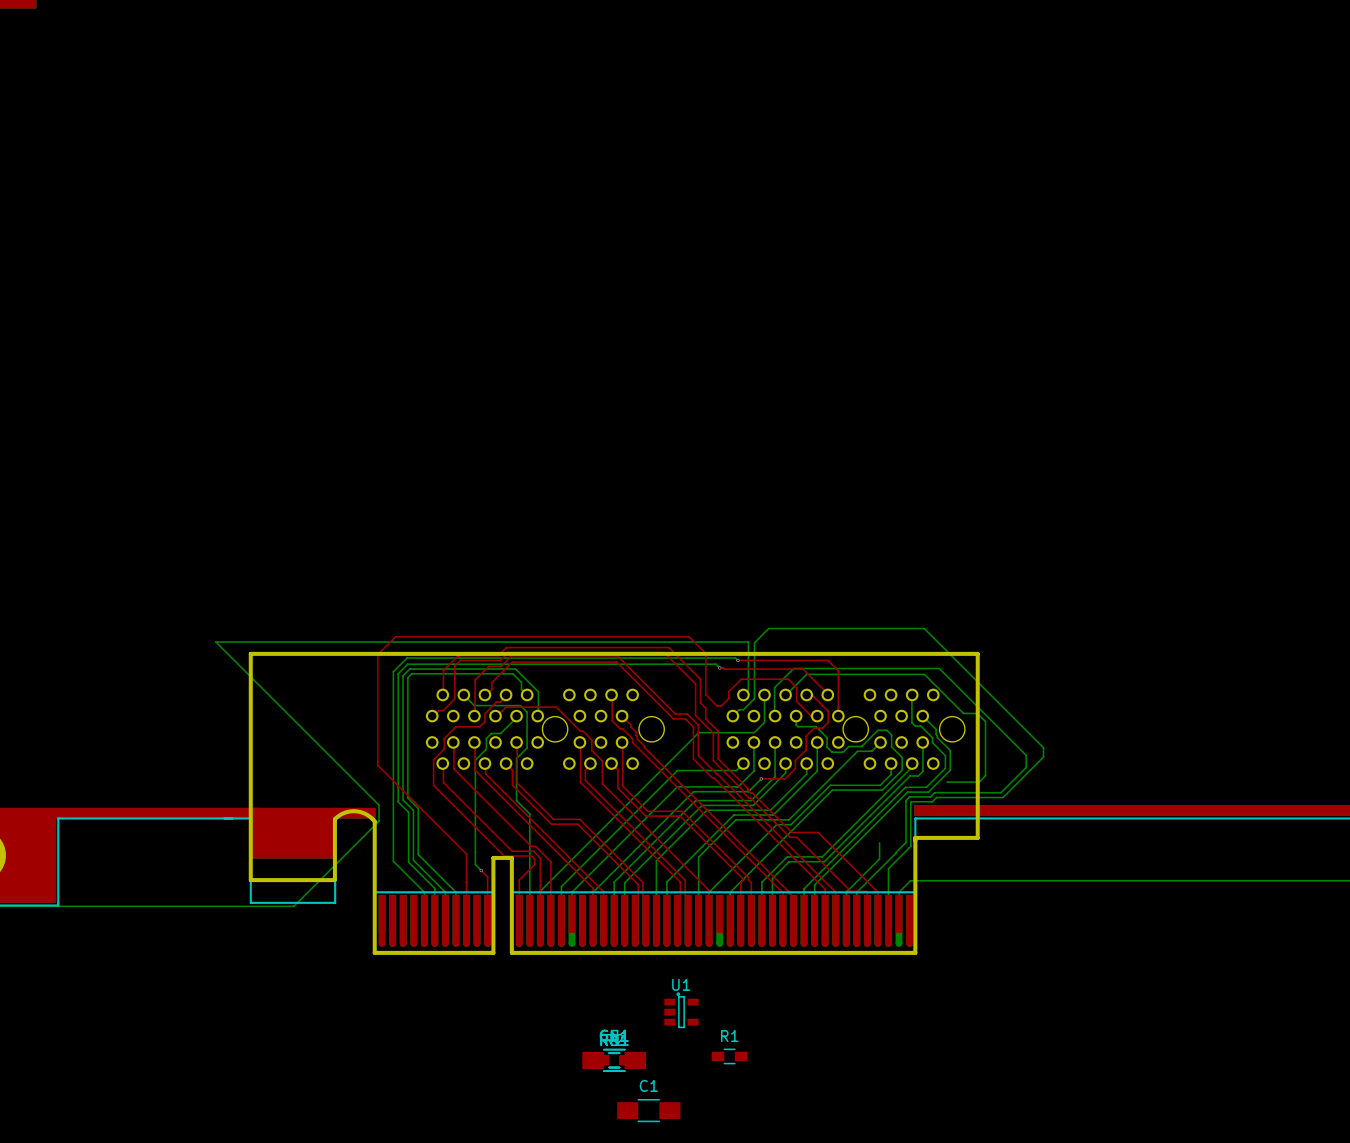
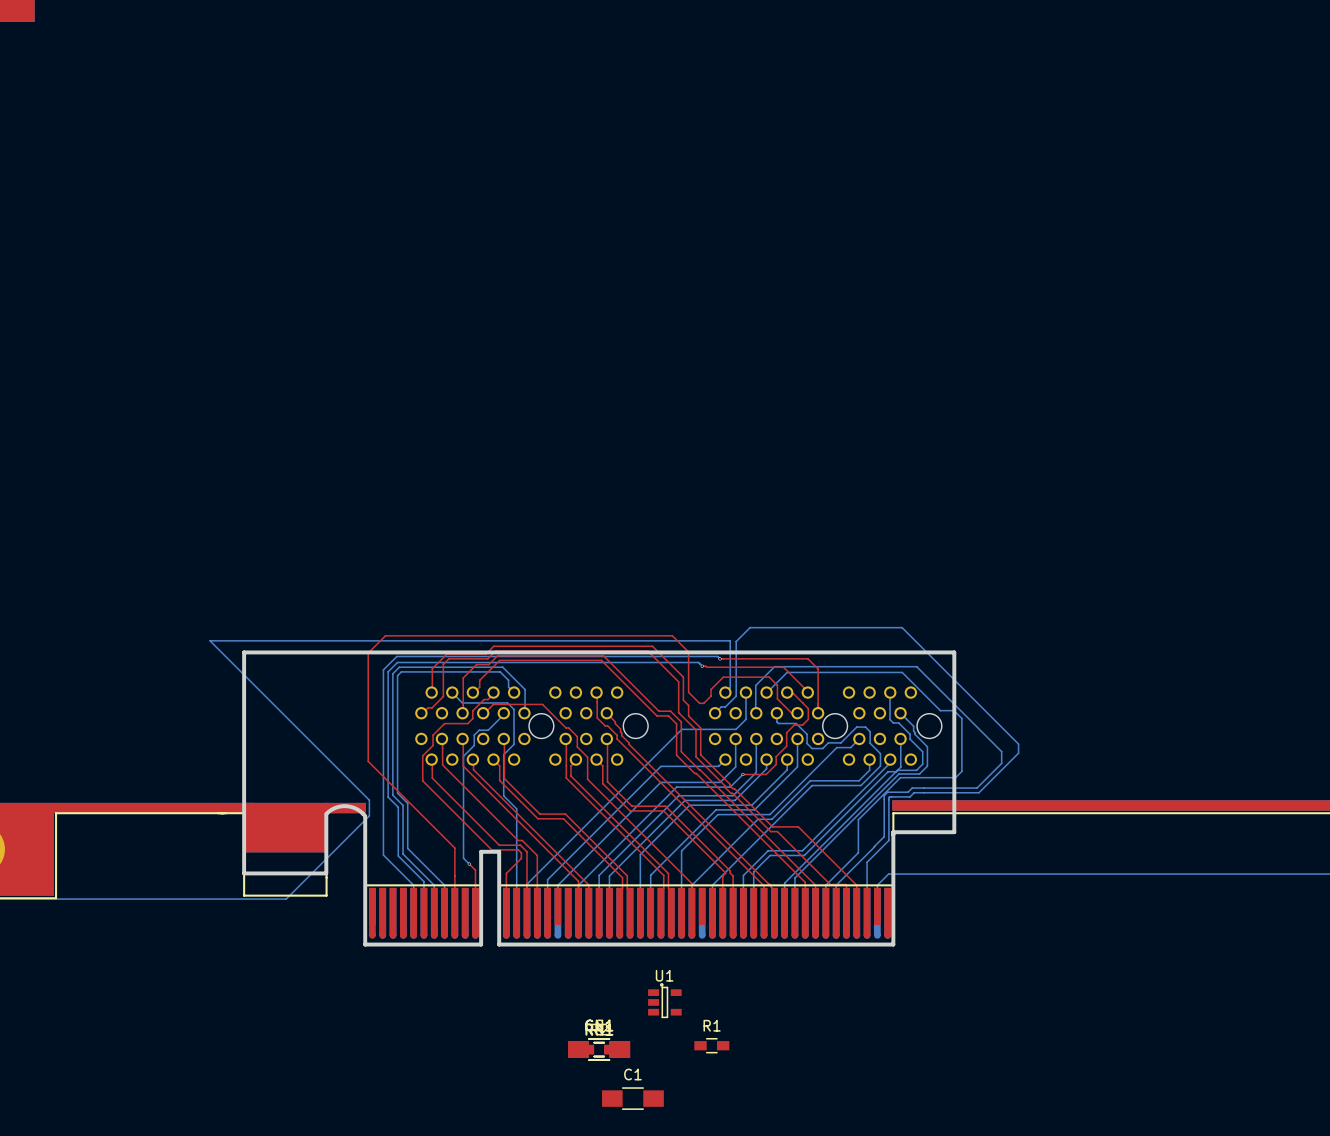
bottom track: (939, 774) (926, 787) (905, 787) (804, 890) -> (916, 770) (897, 770) (784, 883)
bottom track: (942, 778) (928, 792) (907, 792) (814, 885) -> (919, 774) (898, 774) (794, 878)
bottom track: none -> (924, 777) (900, 777) (858, 819) (858, 837)

